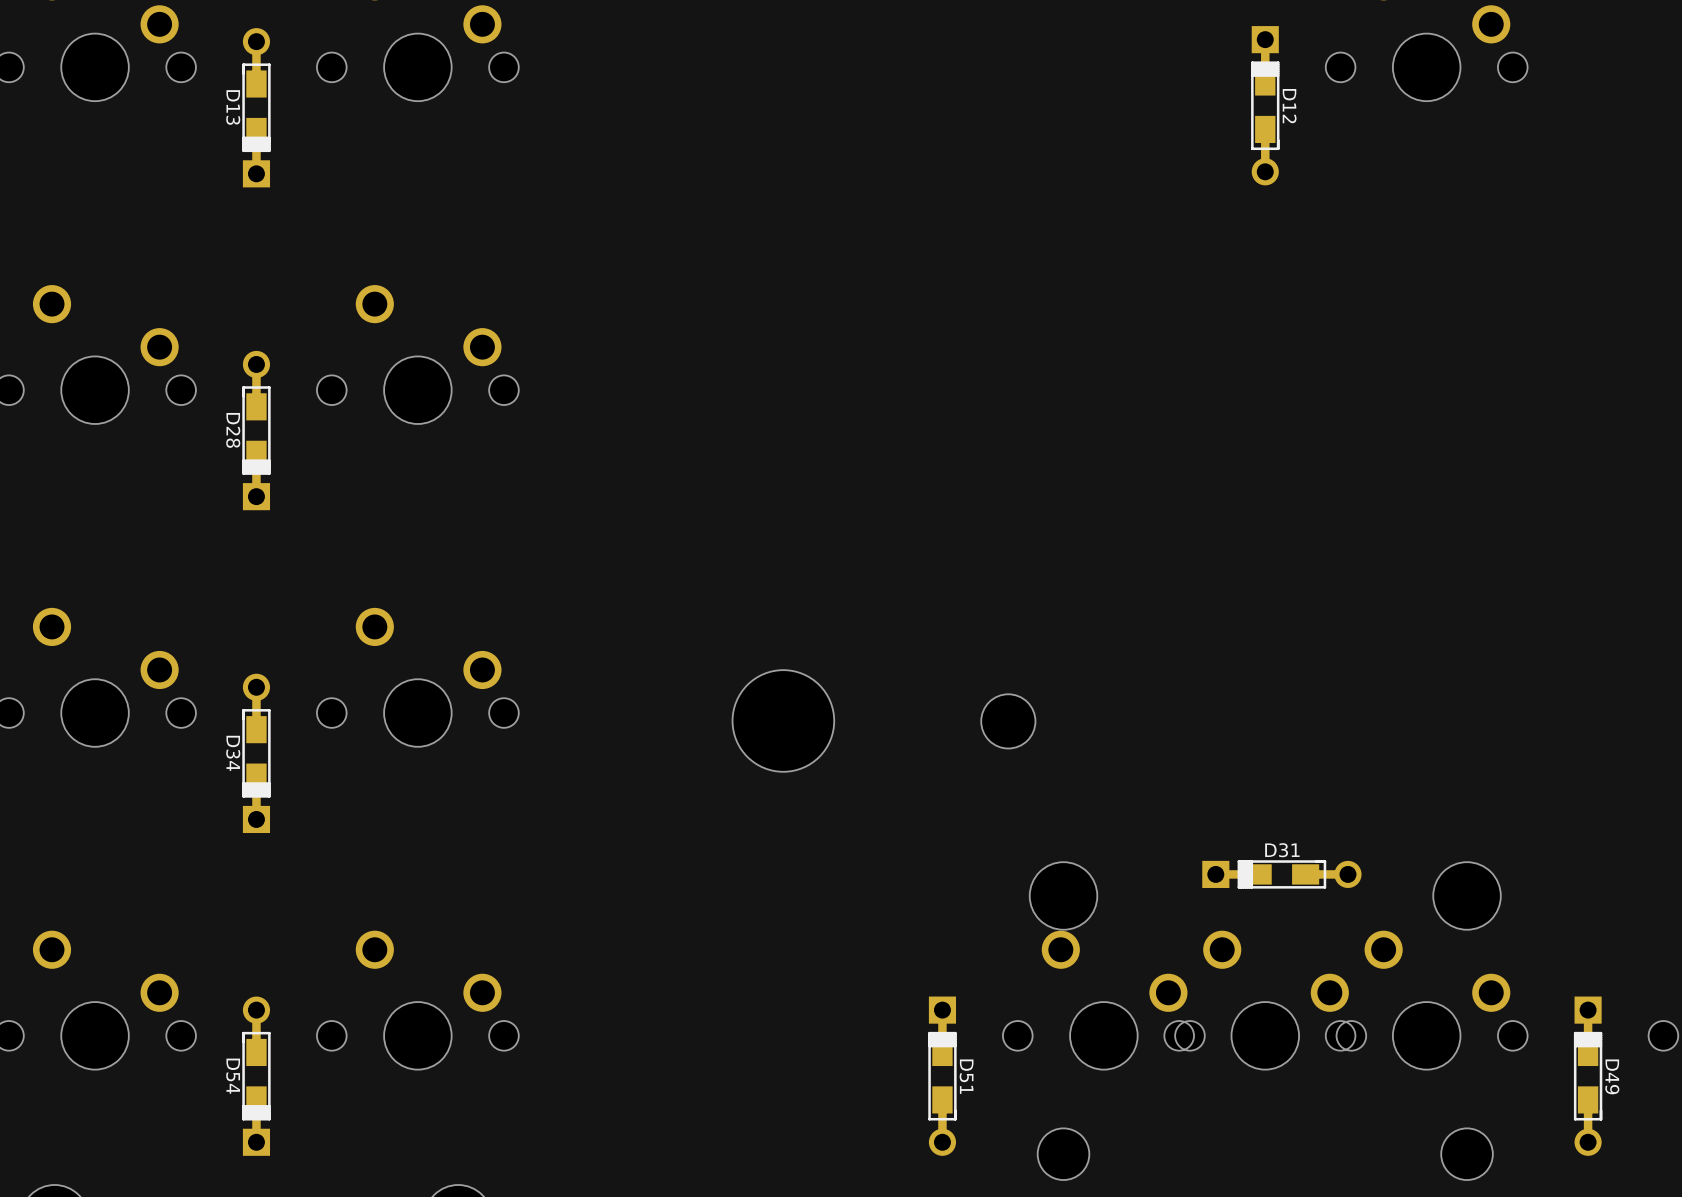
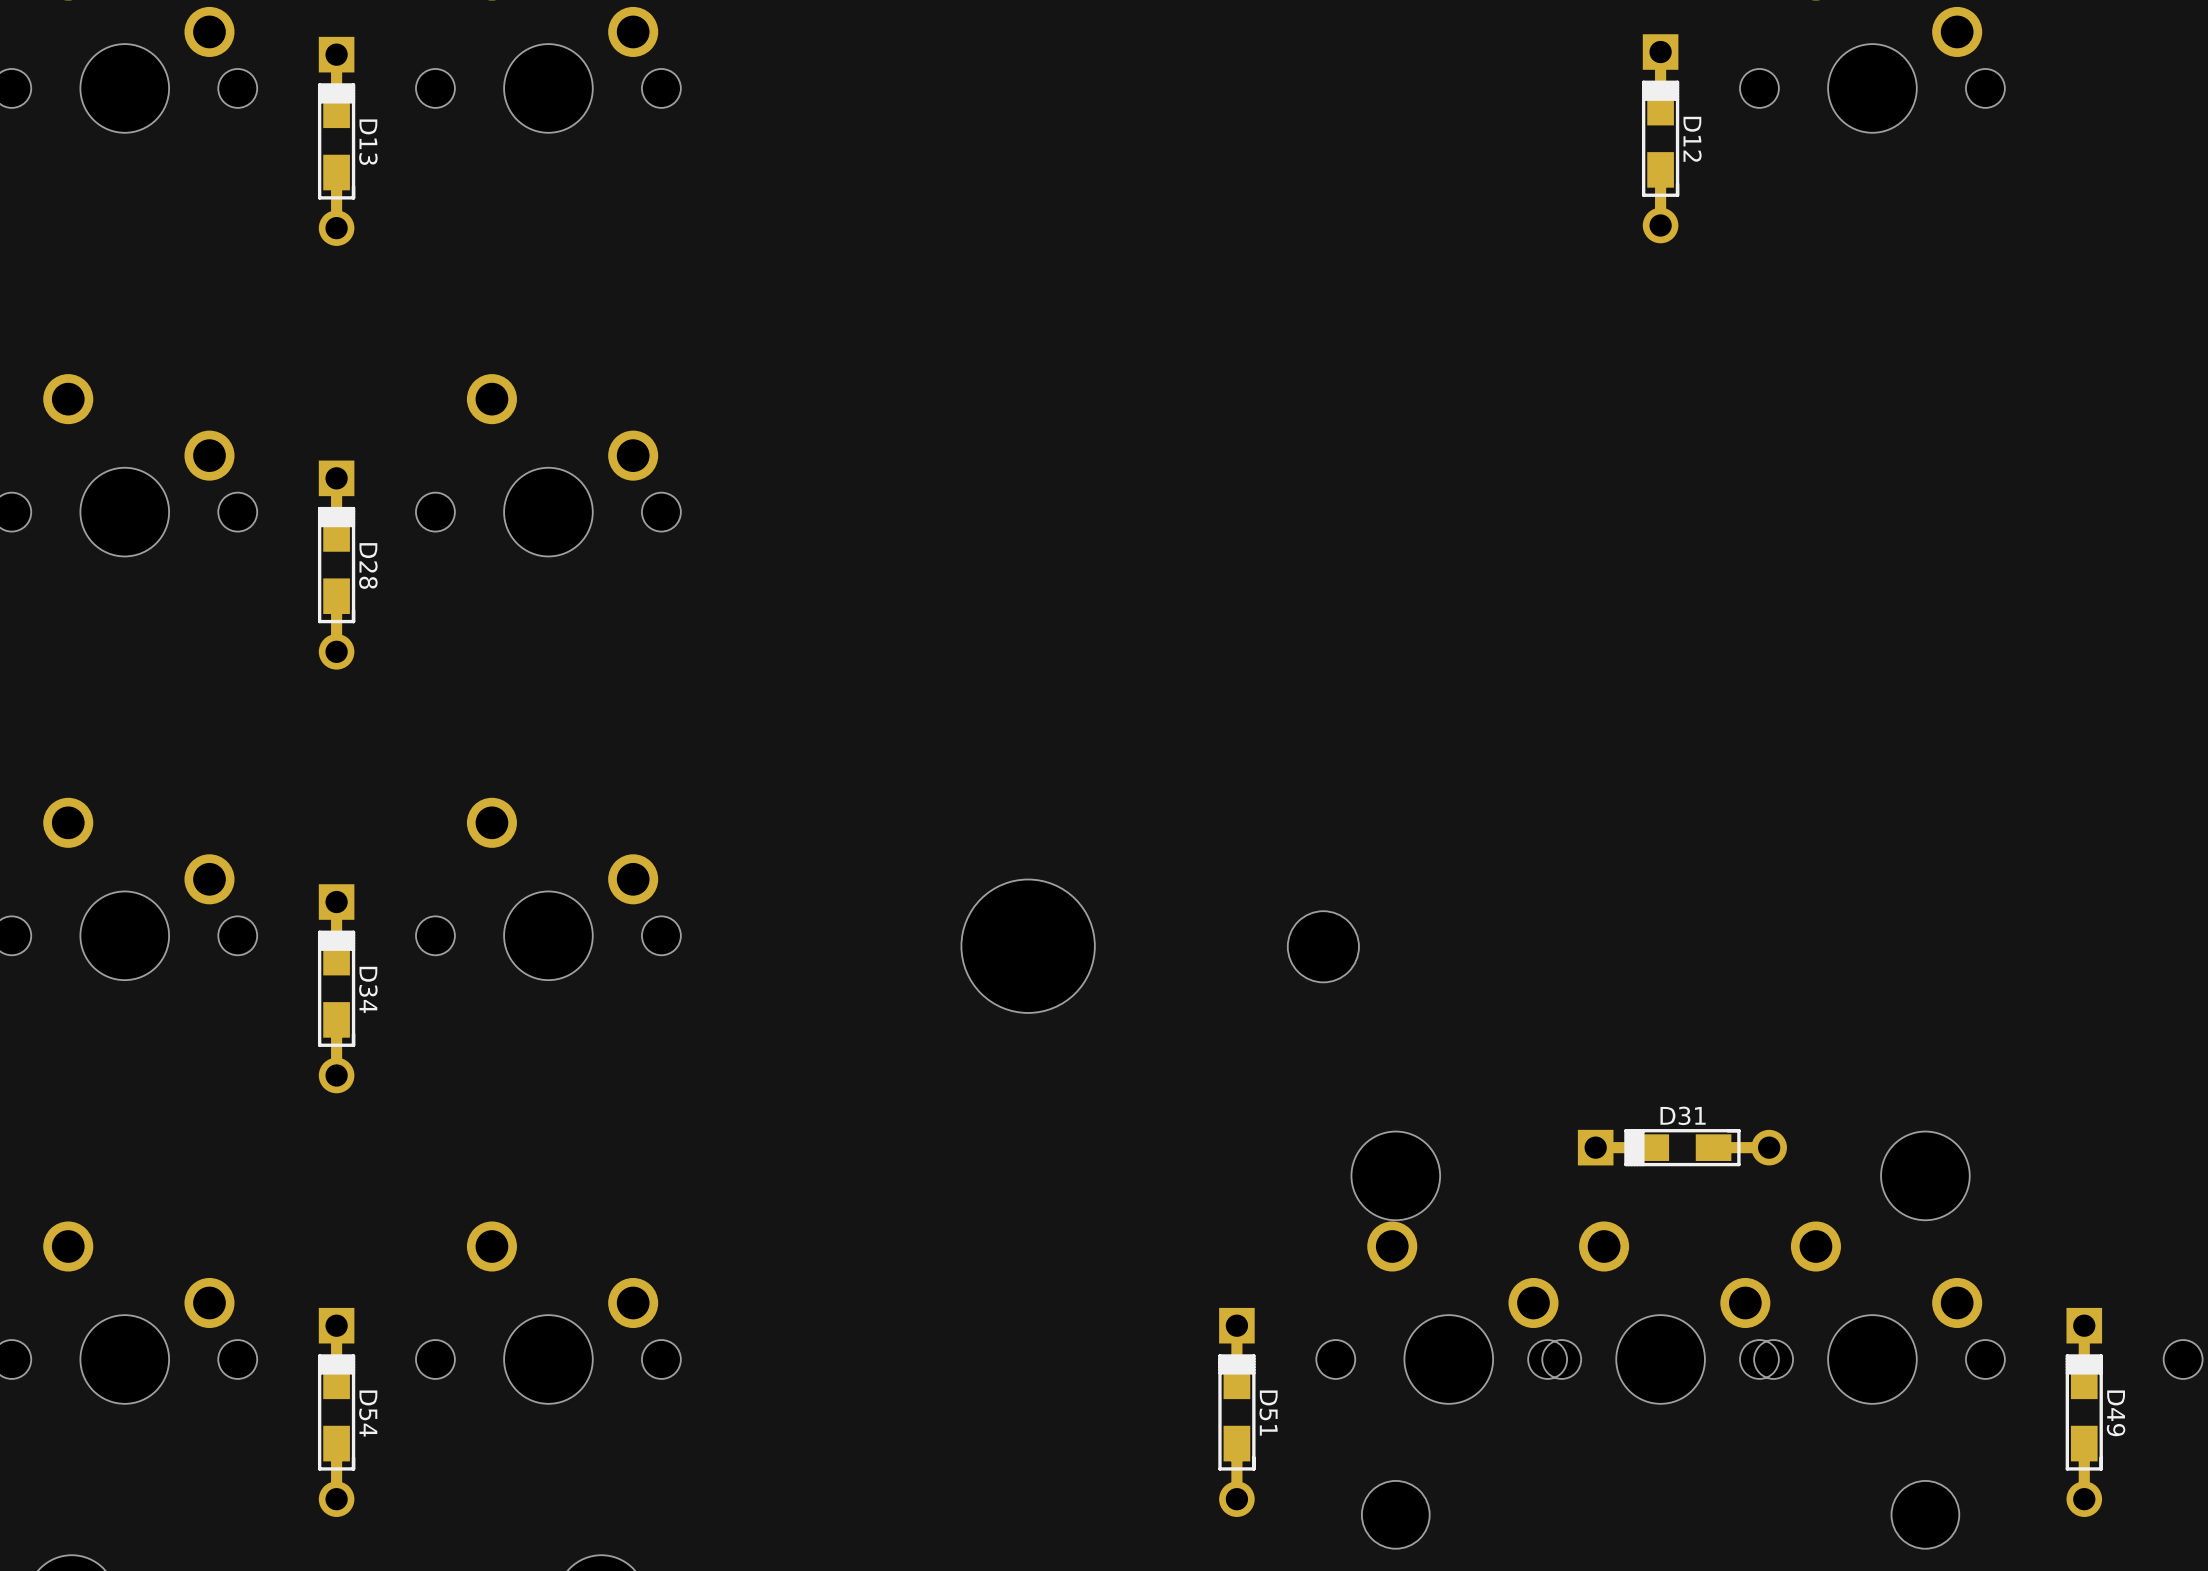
D13 rotation: 0° (256, 107) -> 180° (336, 141)
D28 rotation: 0° (256, 430) -> 180° (336, 565)
D34 rotation: 0° (256, 753) -> 180° (336, 988)
D54 rotation: 0° (256, 1076) -> 180° (336, 1412)

